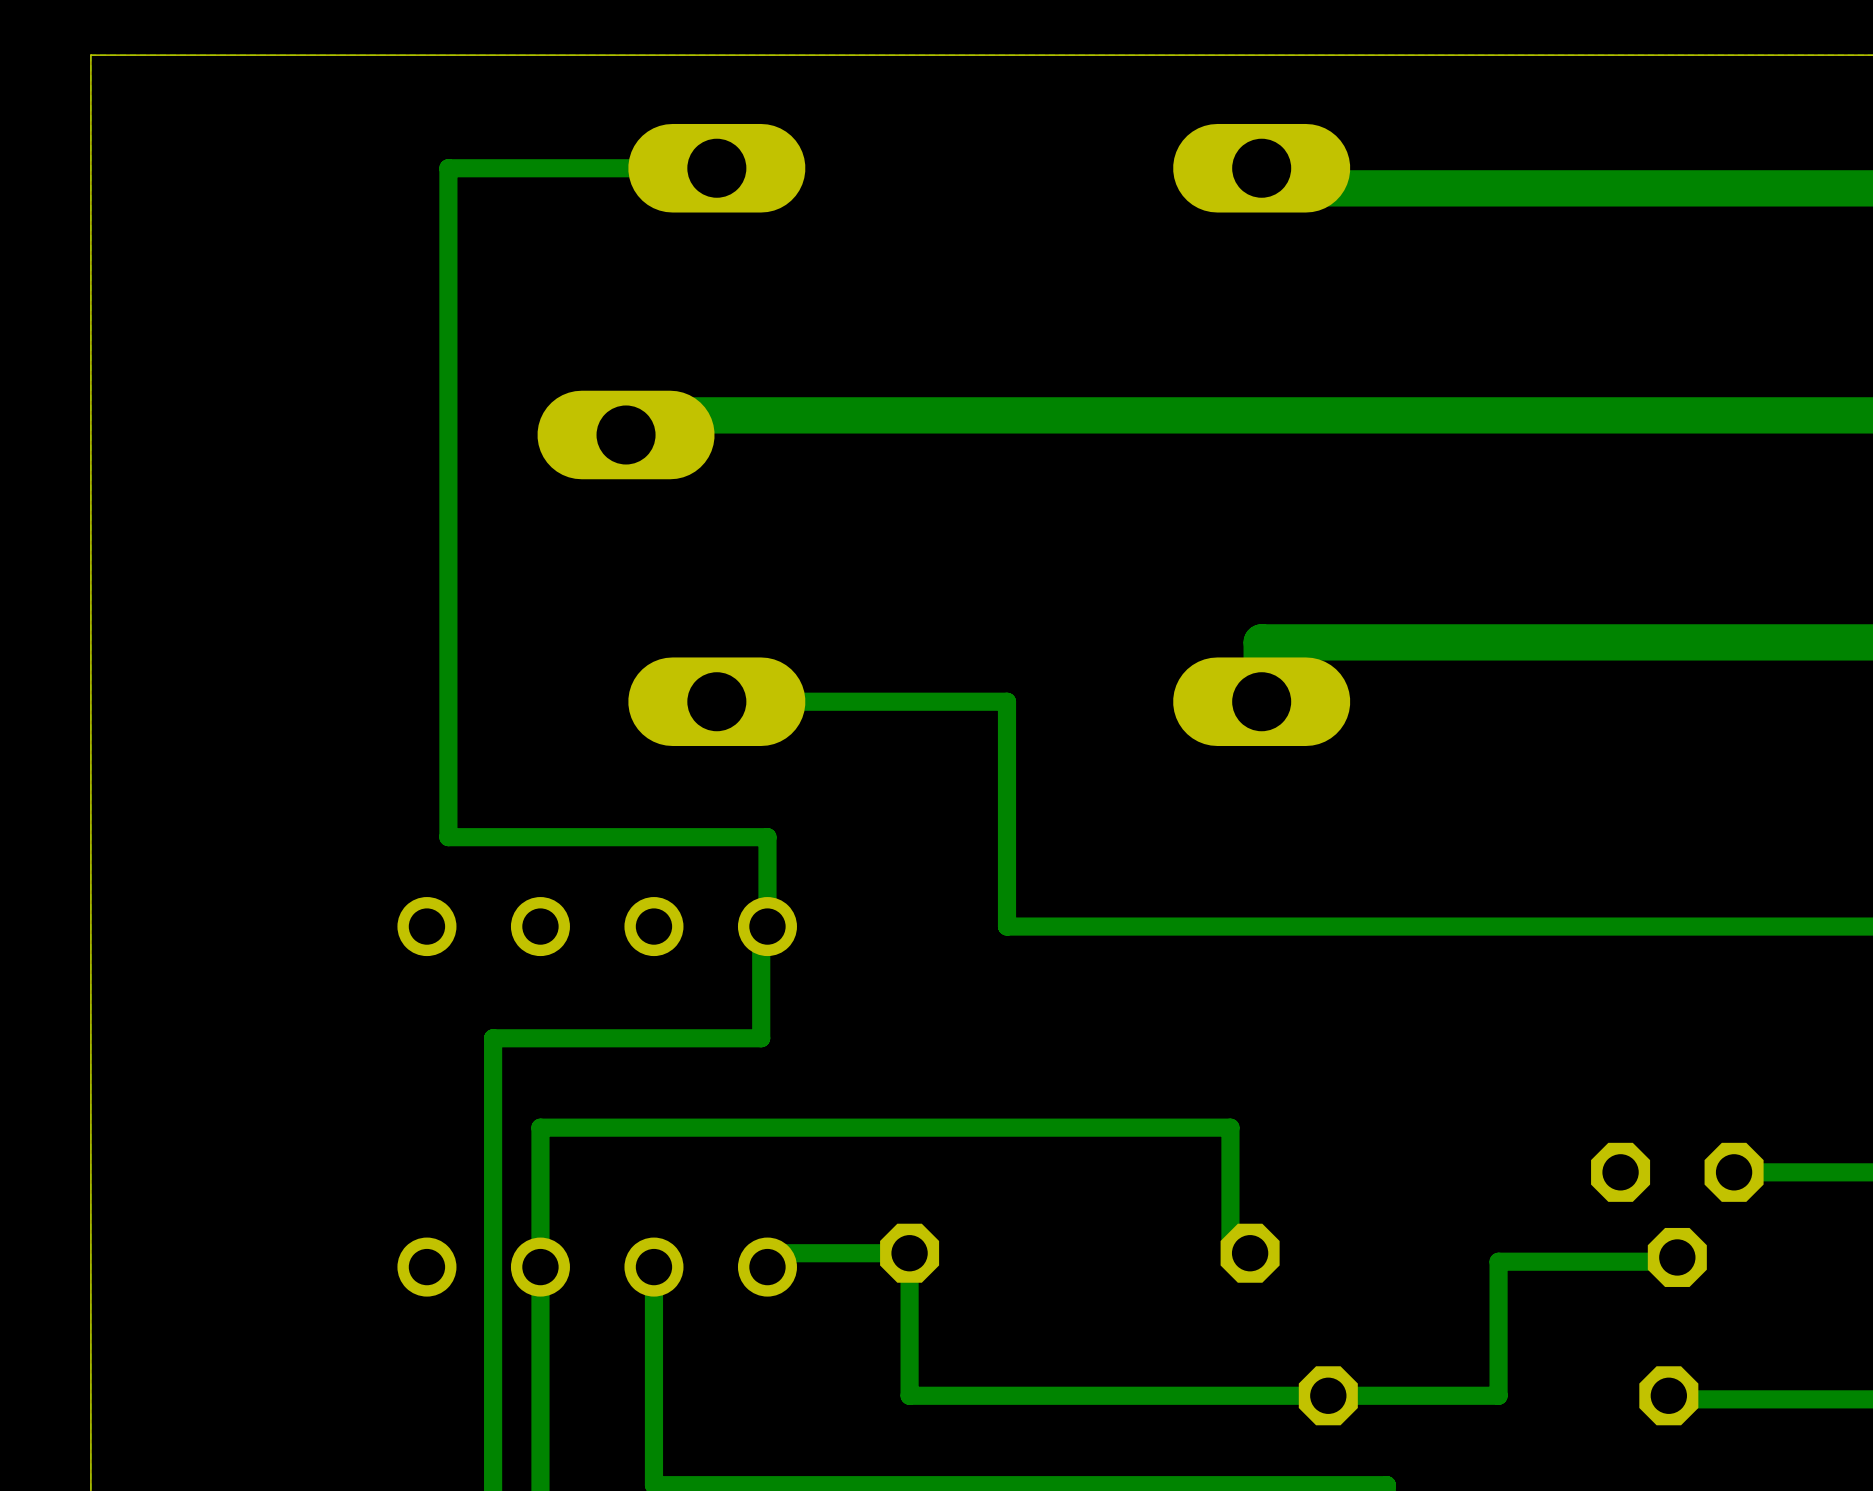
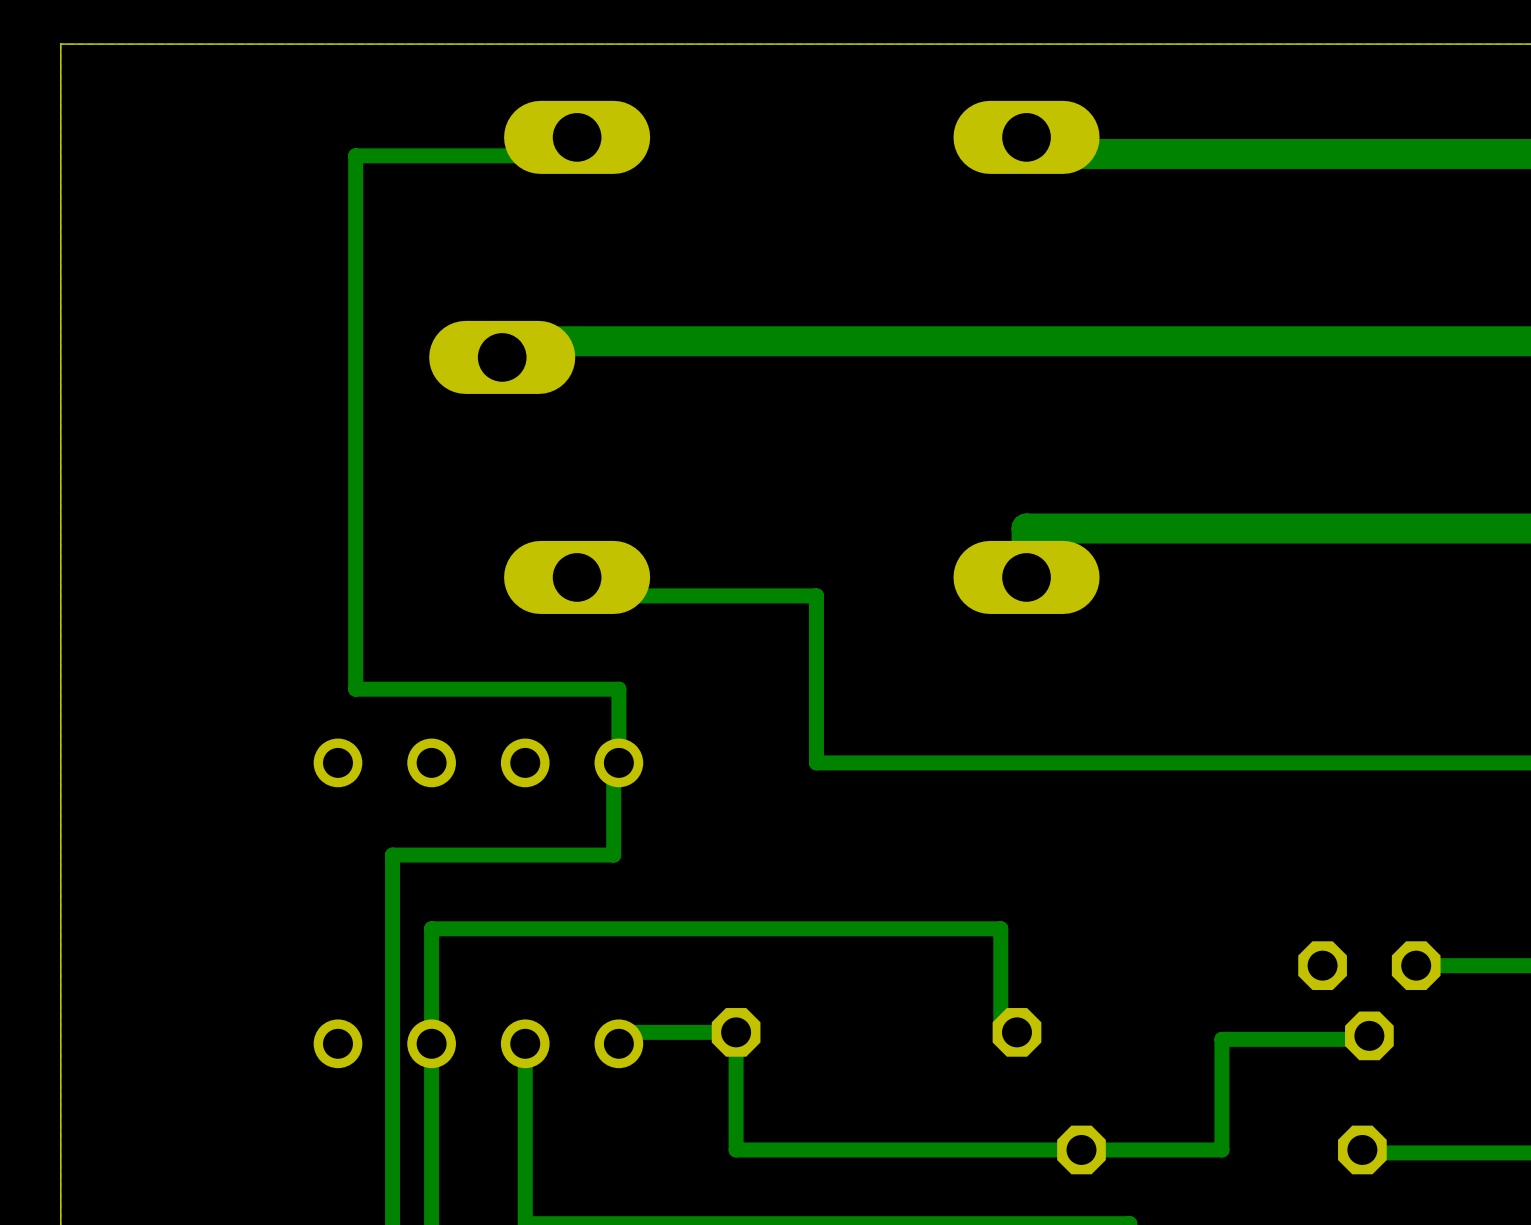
bottom track: (716, 168) (448, 168) (448, 190) -> (577, 155) (355, 155)
bottom track: (716, 701) (1007, 701) (1007, 724) -> (577, 595) (816, 595)

